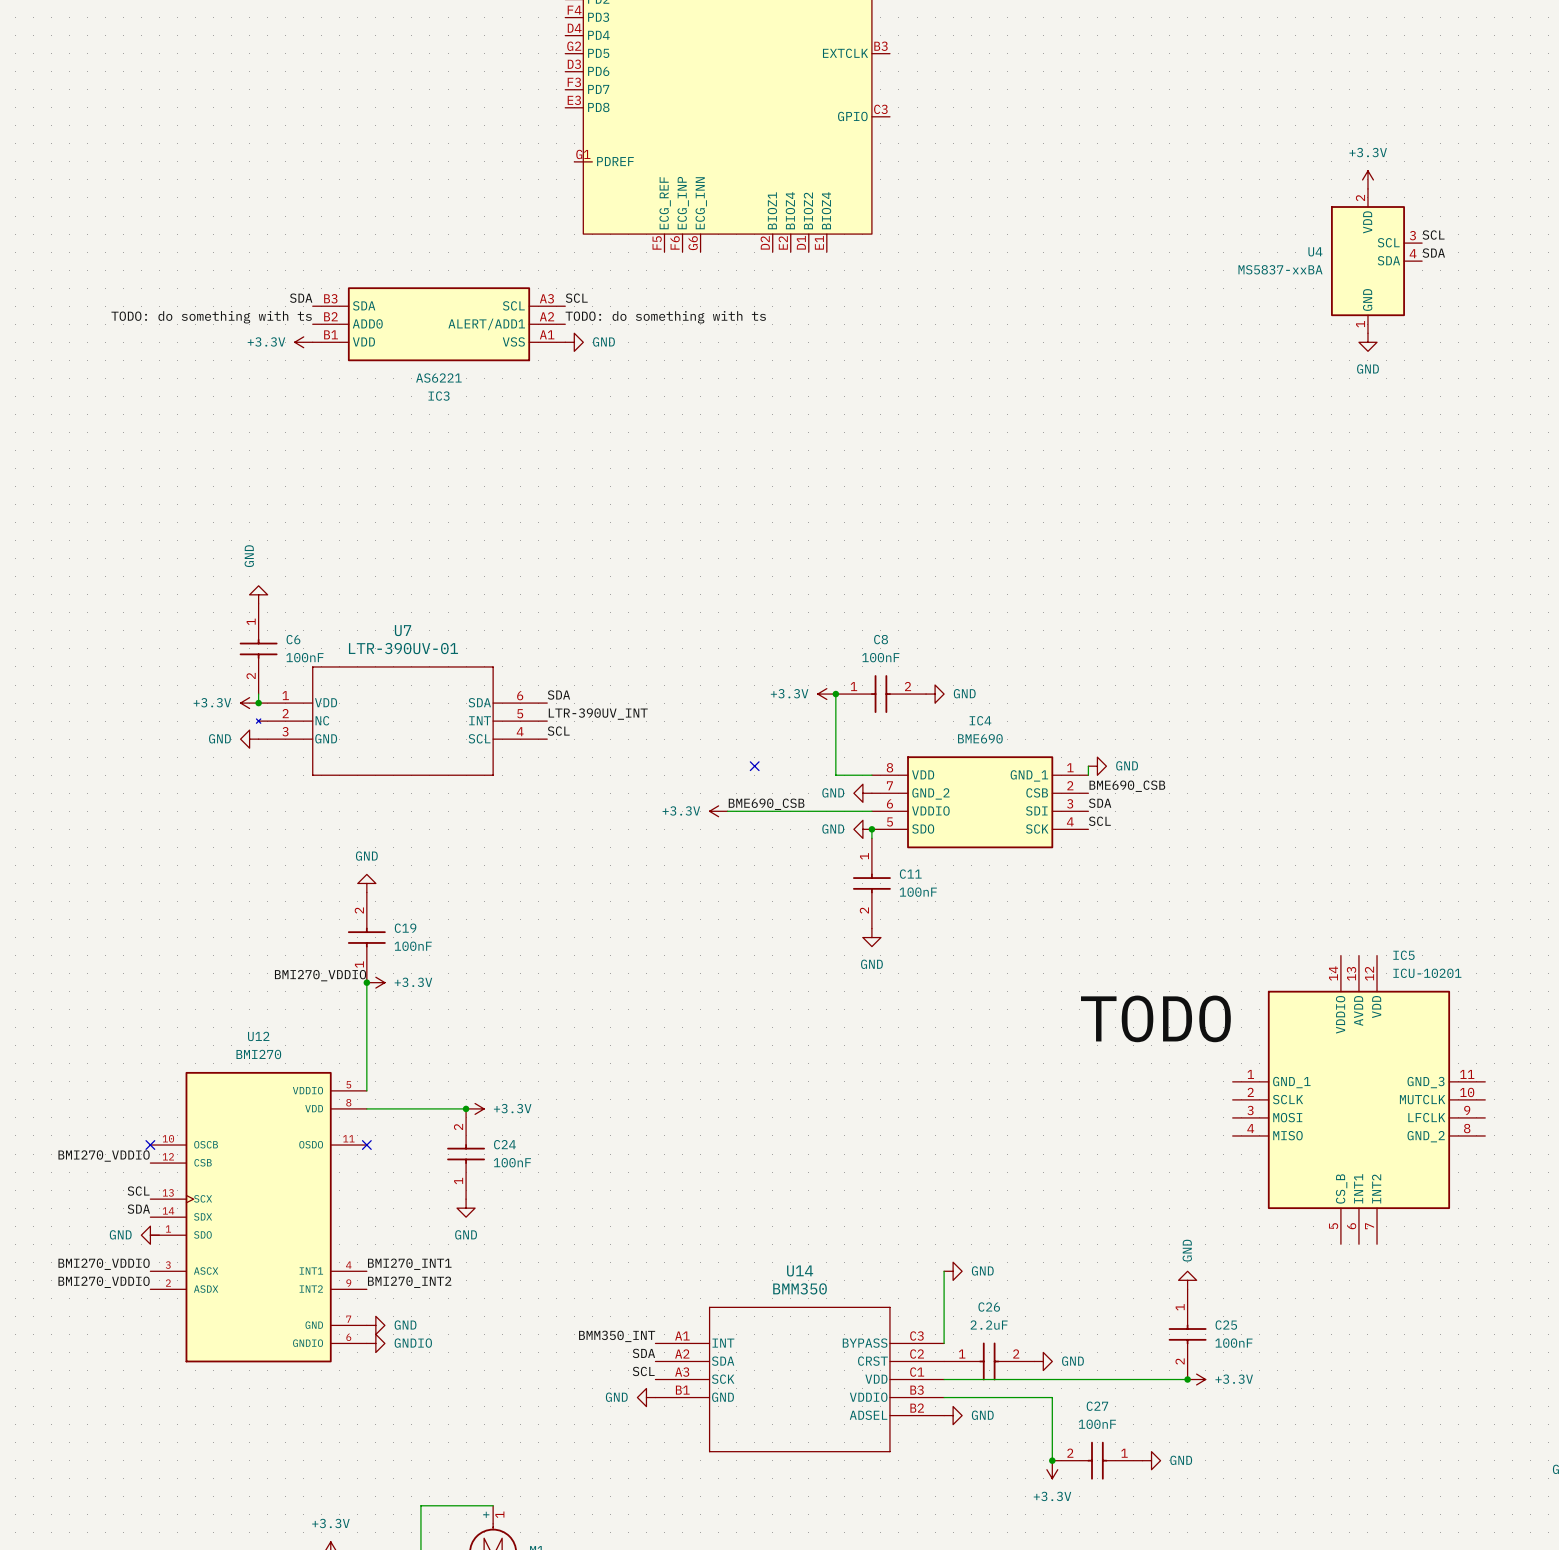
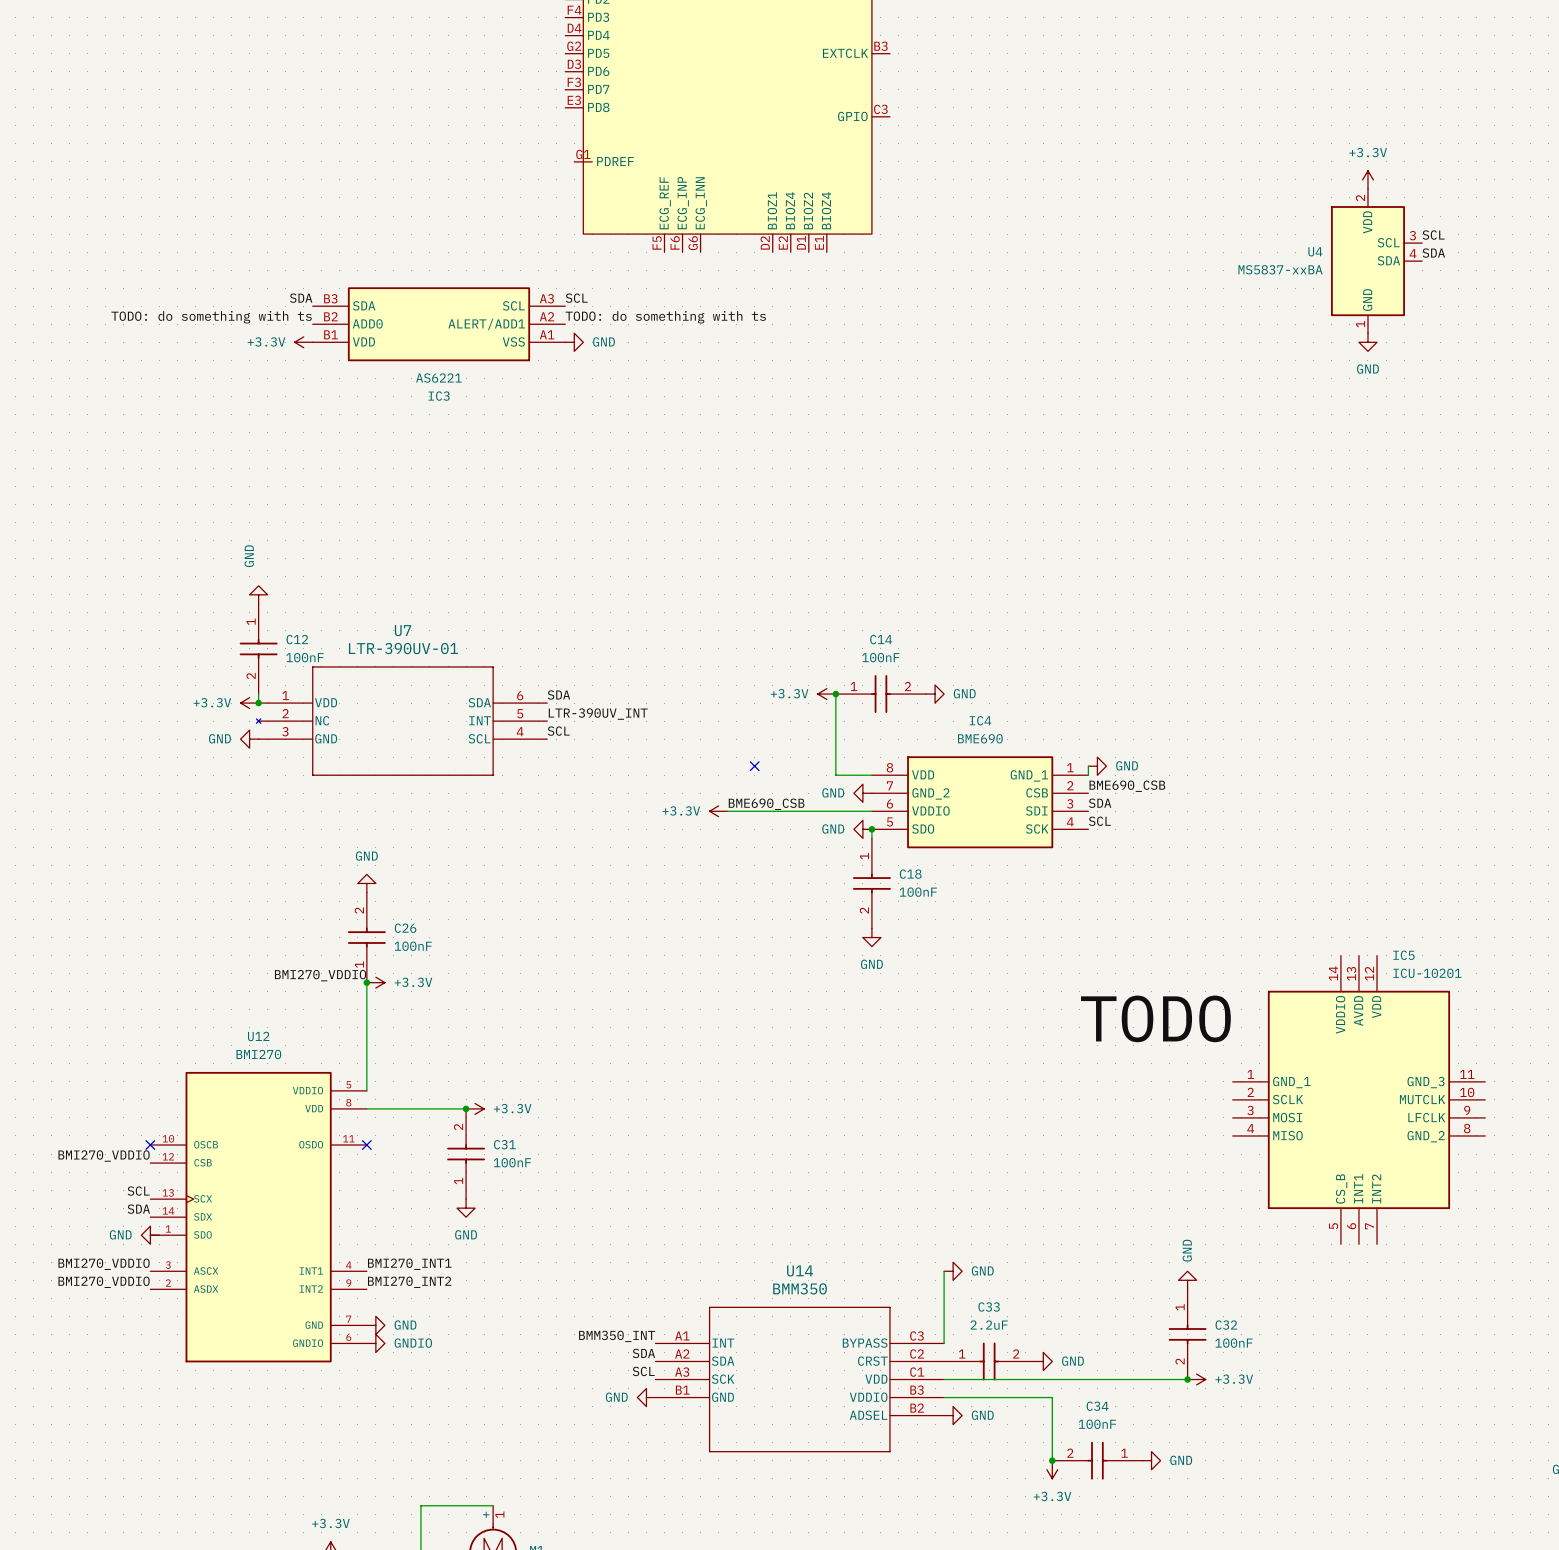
C6 name: C6 (293, 639) -> C12 (297, 639)
C8 name: C8 (881, 639) -> C14 (881, 639)
C11 name: C11 (910, 874) -> C18 (910, 874)
C19 name: C19 (405, 928) -> C26 (405, 928)
C24 name: C24 (504, 1144) -> C31 (504, 1144)
C26 name: C26 (989, 1307) -> C33 (989, 1307)
C25 name: C25 (1226, 1325) -> C32 (1226, 1325)
C27 name: C27 (1097, 1406) -> C34 (1097, 1406)

